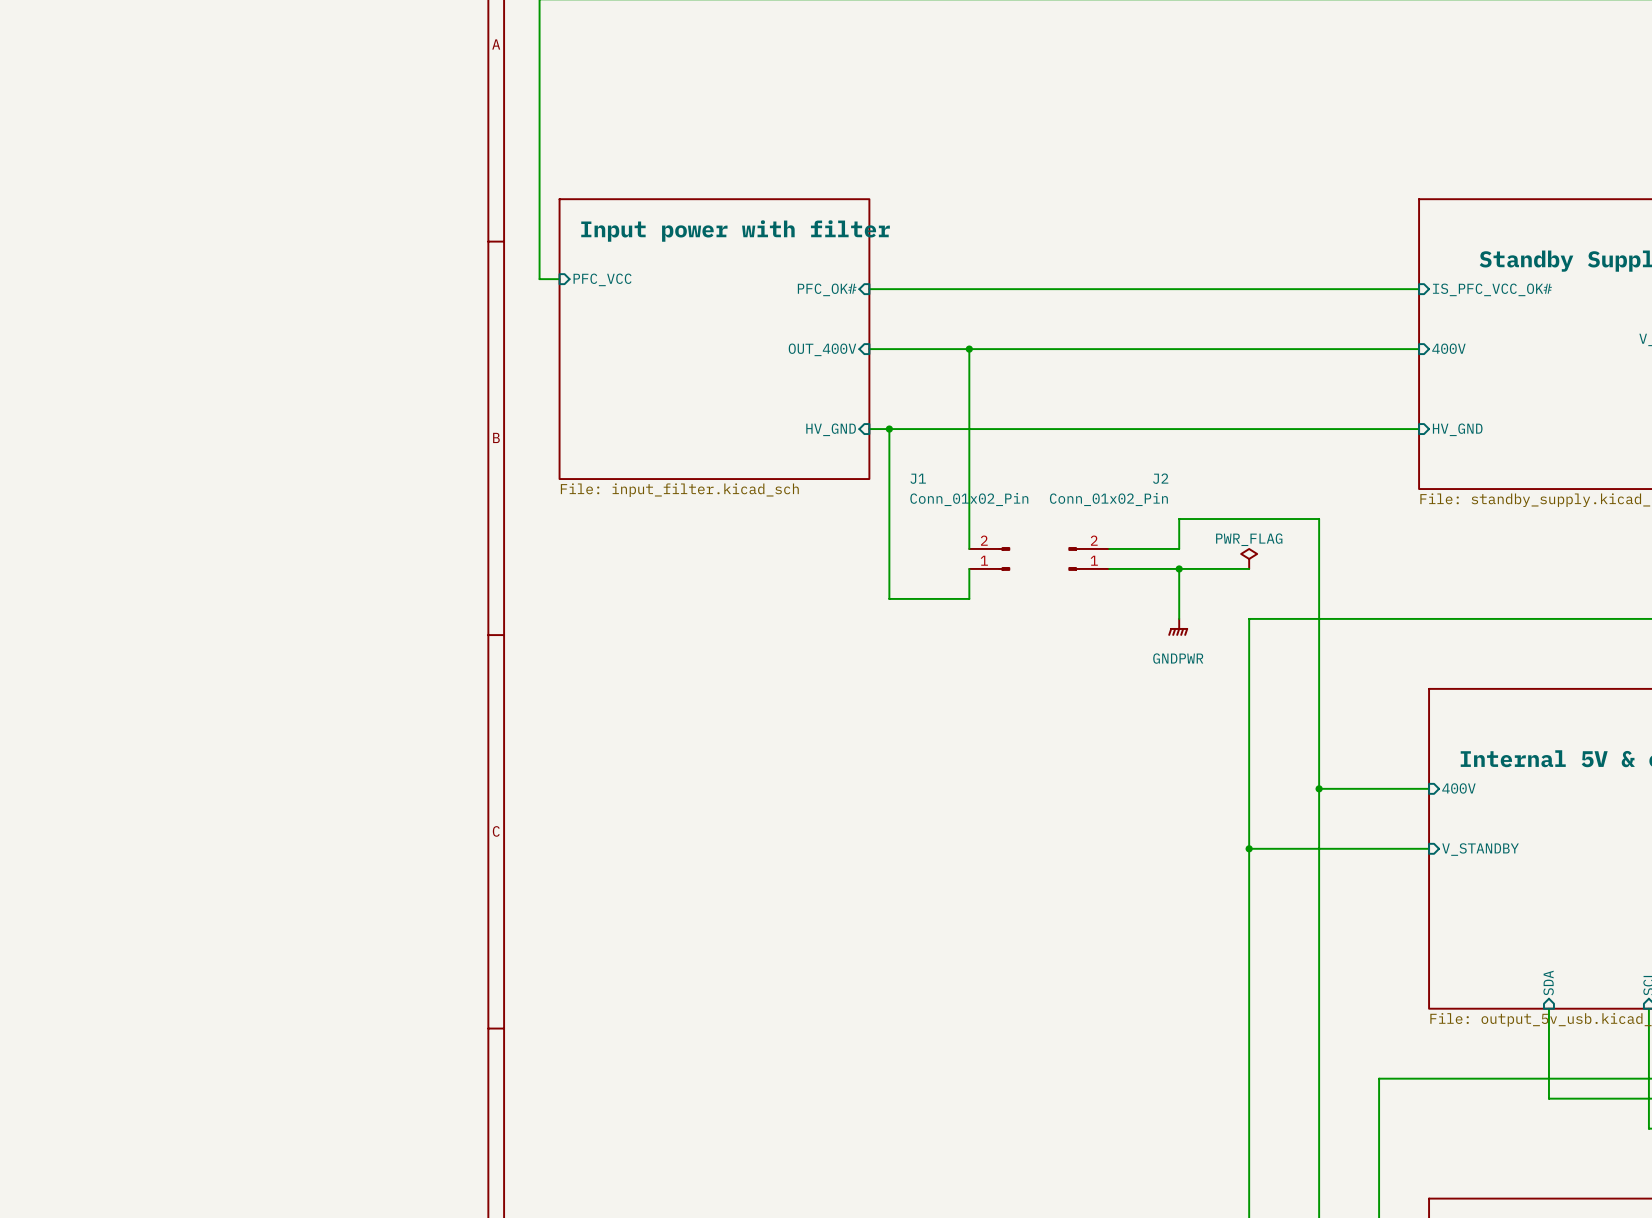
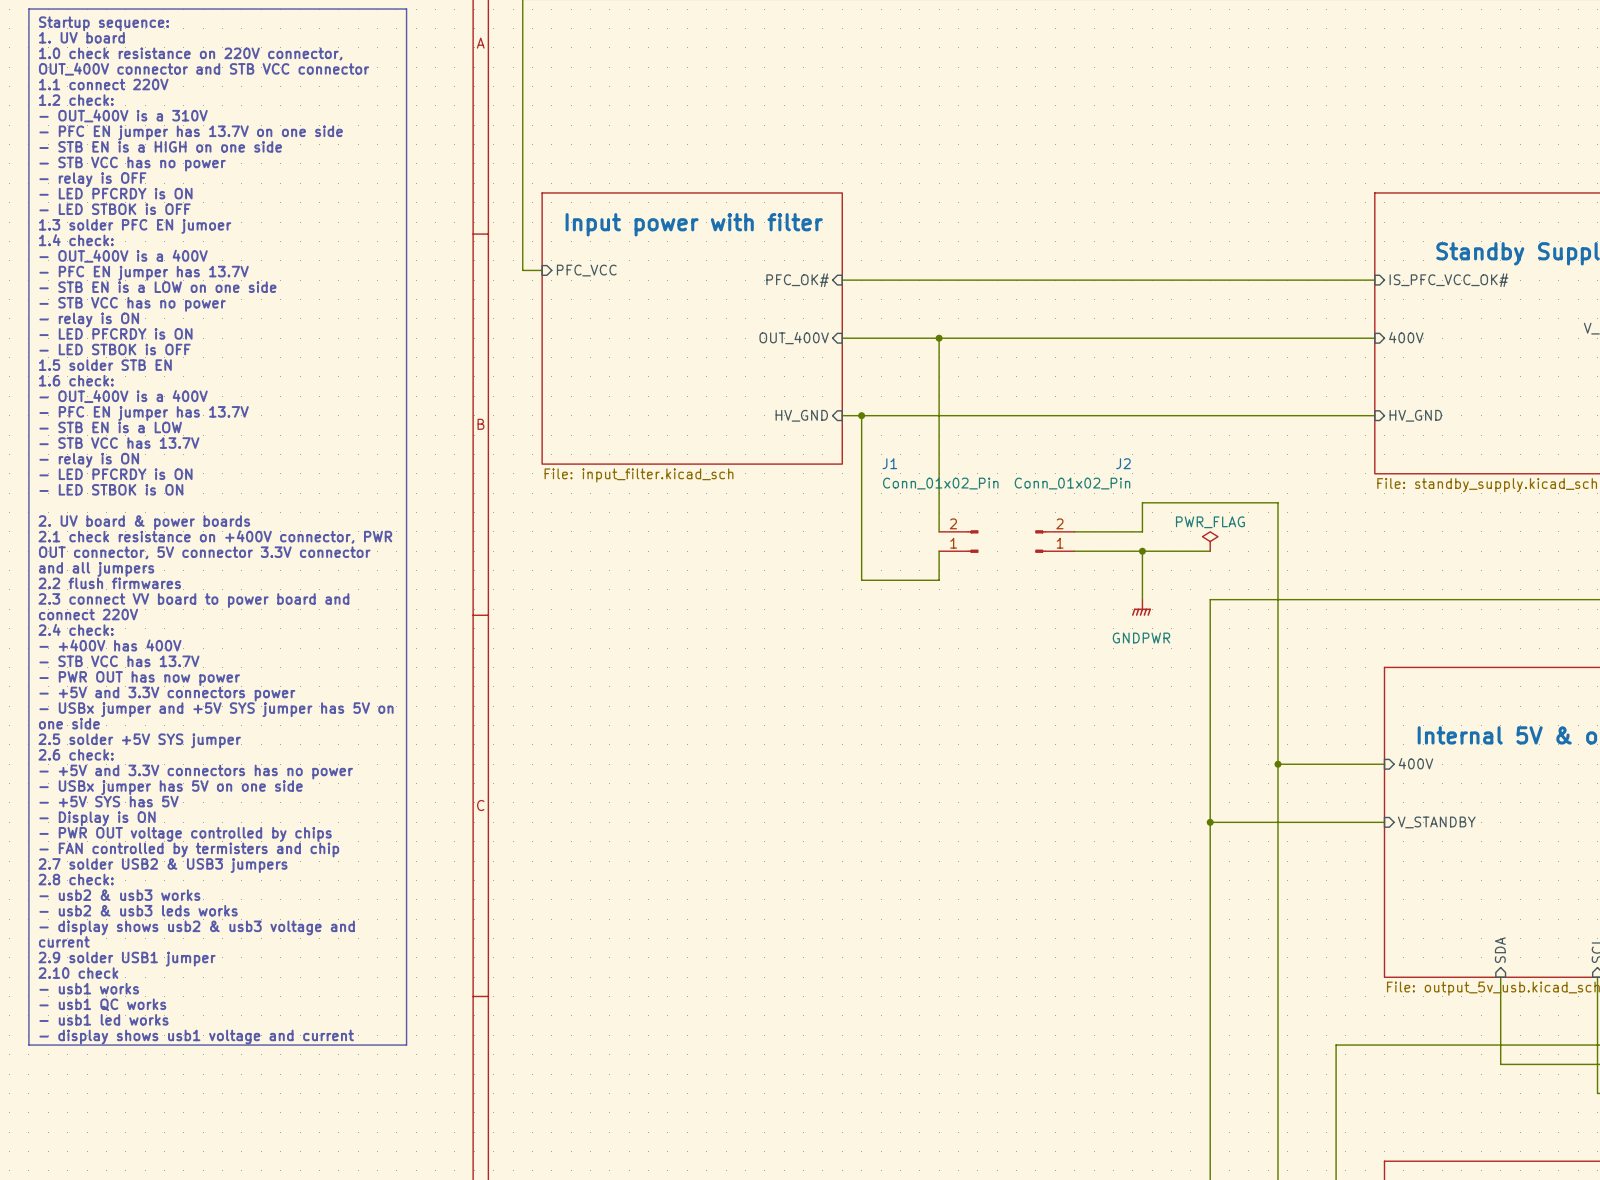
line: none -> (28, 9) (406, 9) (406, 1045) (28, 1045) (28, 9)
text: none -> Startup sequence: (103, 23)
text: none -> 1. UV board (81, 37)
text: none -> 1.0 check resistance on 220V connector, (190, 54)
text: none -> OUT_400V connector and STB VCC connector (204, 69)
text: none -> 1.1 connect 220V (103, 84)
text: none -> 1.2 check: (76, 100)
text: none -> - OUT_400V is a 310V (123, 115)
text: none -> - PFC EN jumper has 13.7V on one side (191, 132)
text: none -> - STB EN is a HIGH on one side (160, 146)
text: none -> - STB VCC has no power (132, 164)
text: none -> - relay is OFF (92, 179)
text: none -> - LED PFCRDY is ON (115, 193)
text: none -> - LED STBOK is OFF (115, 209)
text: none -> 1.3 solder PFC EN jumoer (135, 226)
text: none -> 1.4 check: (76, 240)
text: none -> - OUT_400V is a 400V (123, 256)
text: none -> - PFC EN jumper has 13.7V (144, 273)
text: none -> - STB EN is a LOW on one side (157, 287)
text: none -> - STB VCC has no power (132, 304)
text: none -> - relay is ON (89, 319)
text: none -> - LED PFCRDY is ON (115, 333)
text: none -> - LED STBOK is OFF (115, 349)
text: none -> 1.5 solder STB EN (105, 365)
text: none -> 1.6 check: (76, 380)
text: none -> - OUT_400V is a 400V (123, 396)
text: none -> - PFC EN jumper has 13.7V (144, 413)
text: none -> - STB EN is a LOW (110, 427)
text: none -> - STB VCC has 13.7V (119, 443)
text: none -> - relay is ON (89, 460)
text: none -> - LED PFCRDY is ON (115, 474)
text: none -> - LED STBOK is ON (111, 489)
text: none -> 2. UV board & power boards (144, 522)
text: none -> 2.1 check resistance on +400V connector, PWR (215, 537)
text: none -> OUT connector, 5V connector 3.3V connector (204, 552)
text: none -> and all jumpers (96, 569)
text: none -> 2.2 flush firmwares (109, 583)
text: none -> 2.3 connect VV board to power board and (193, 600)
text: none -> connect 220V (88, 614)
text: none -> 2.4 check: (76, 629)
text: none -> - +400V has 400V (110, 645)
text: none -> - STB VCC has 13.7V (119, 661)
text: none -> - PWR OUT has now power (139, 678)
text: none -> - +5V and 3.3V connectors power (167, 694)
text: none -> - USBx jumper and +5V SYS jumper has 5V on (216, 709)
text: none -> one side (69, 723)
text: none -> 2.5 solder +5V SYS jumper (139, 740)
text: none -> 2.6 check: (76, 754)
text: none -> - +5V and 3.3V connectors has no power (196, 772)
text: none -> - USBx jumper has 5V on one side (171, 787)
text: none -> - +5V SYS has 5V (109, 801)
text: none -> - Display is ON (97, 818)
text: none -> - PWR OUT voltage controlled by chips (185, 834)
text: none -> - FAN controlled by termisters and chip (189, 849)
text: none -> 2.7 solder USB2 & USB3 jumpers (163, 865)
text: none -> 2.8 check: (76, 879)
text: none -> - usb2 & usb3 works (119, 895)
text: none -> - usb2 & usb3 leds works (138, 910)
text: none -> - display shows usb2 & usb3 voltage and (197, 927)
text: none -> current (64, 941)
text: none -> 2.9 solder USB1 jumper (127, 959)
text: none -> 2.10 check (78, 973)
text: none -> - usb1 works (89, 988)
text: none -> - usb1 QC works (102, 1004)
text: none -> - usb1 led works (103, 1019)
text: none -> - display shows usb1 voltage and current (196, 1037)

